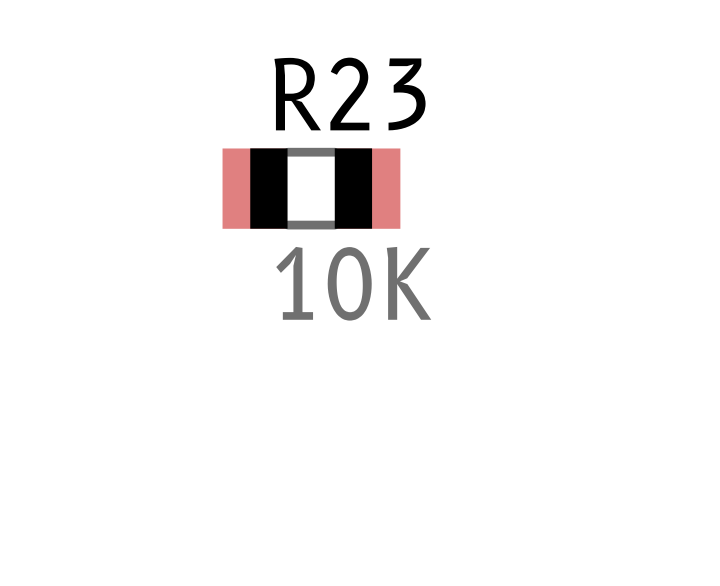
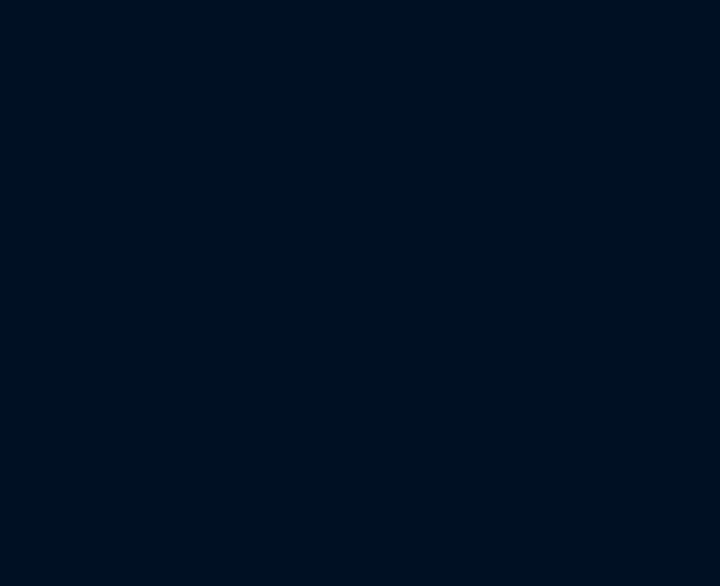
R23: 10K (311, 188) -> none

